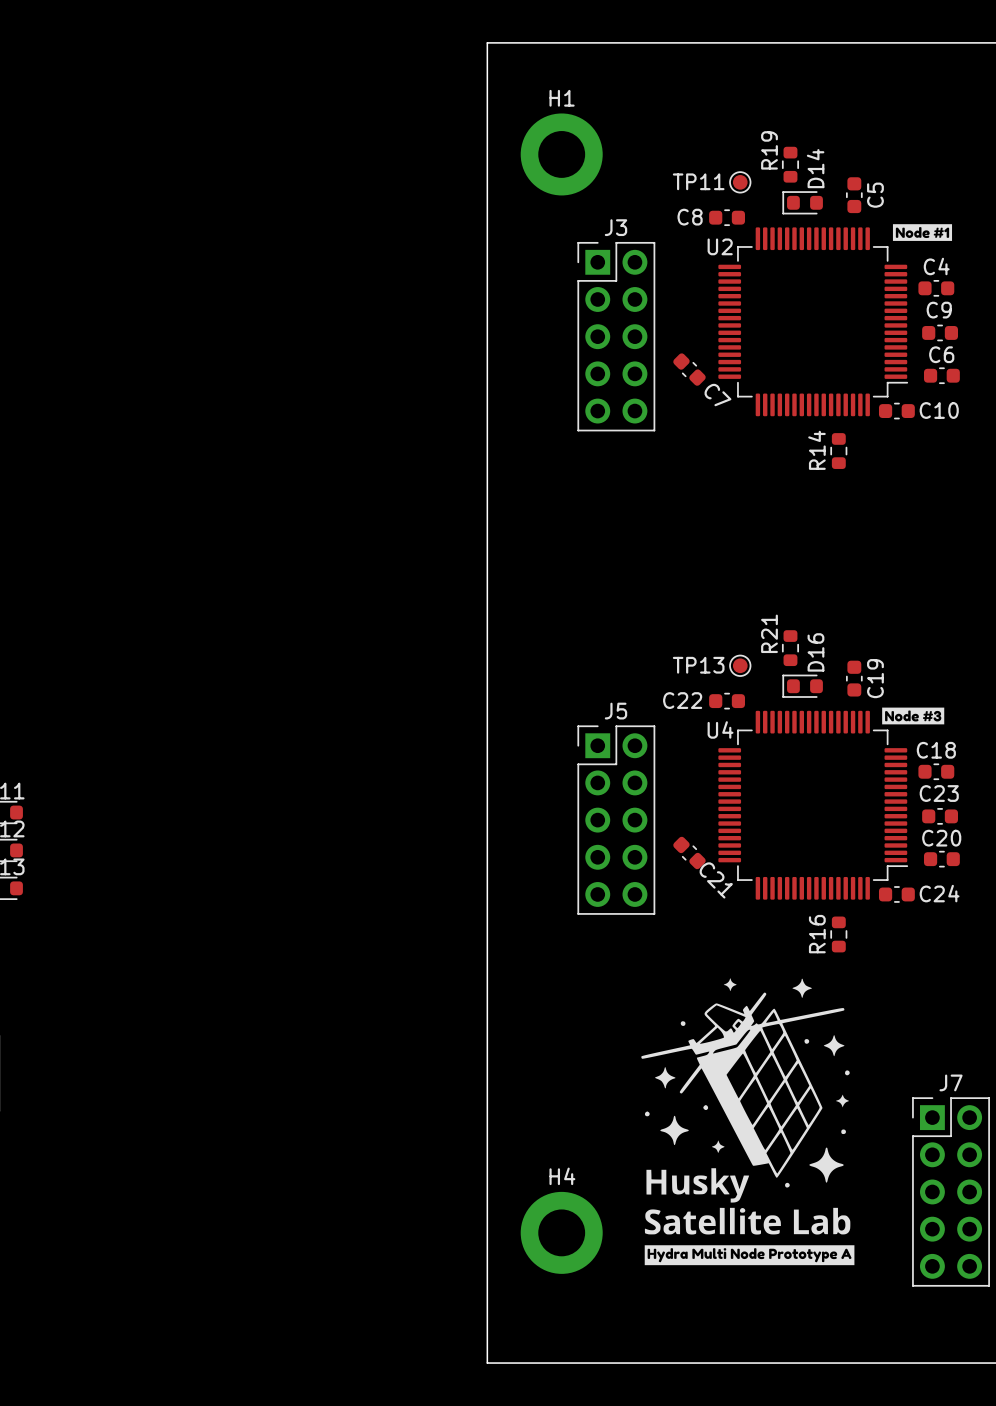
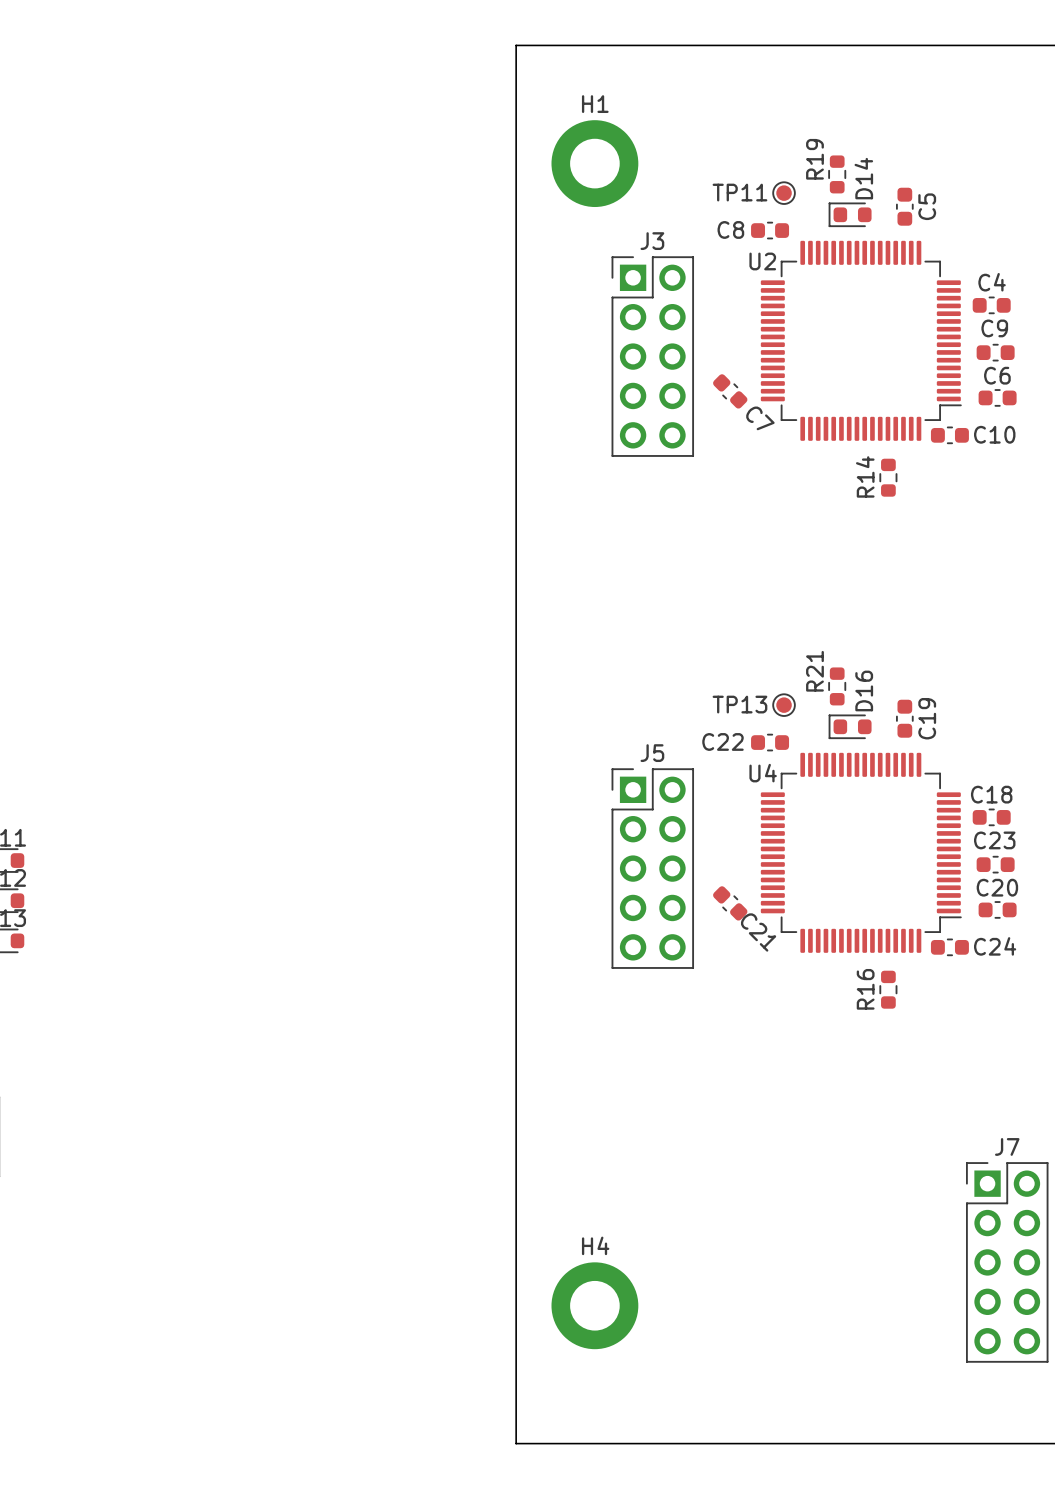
drawing: [892, 224, 953, 241] -> none
drawing: [882, 707, 945, 725] -> none
drawing: [641, 978, 855, 1266] -> none

